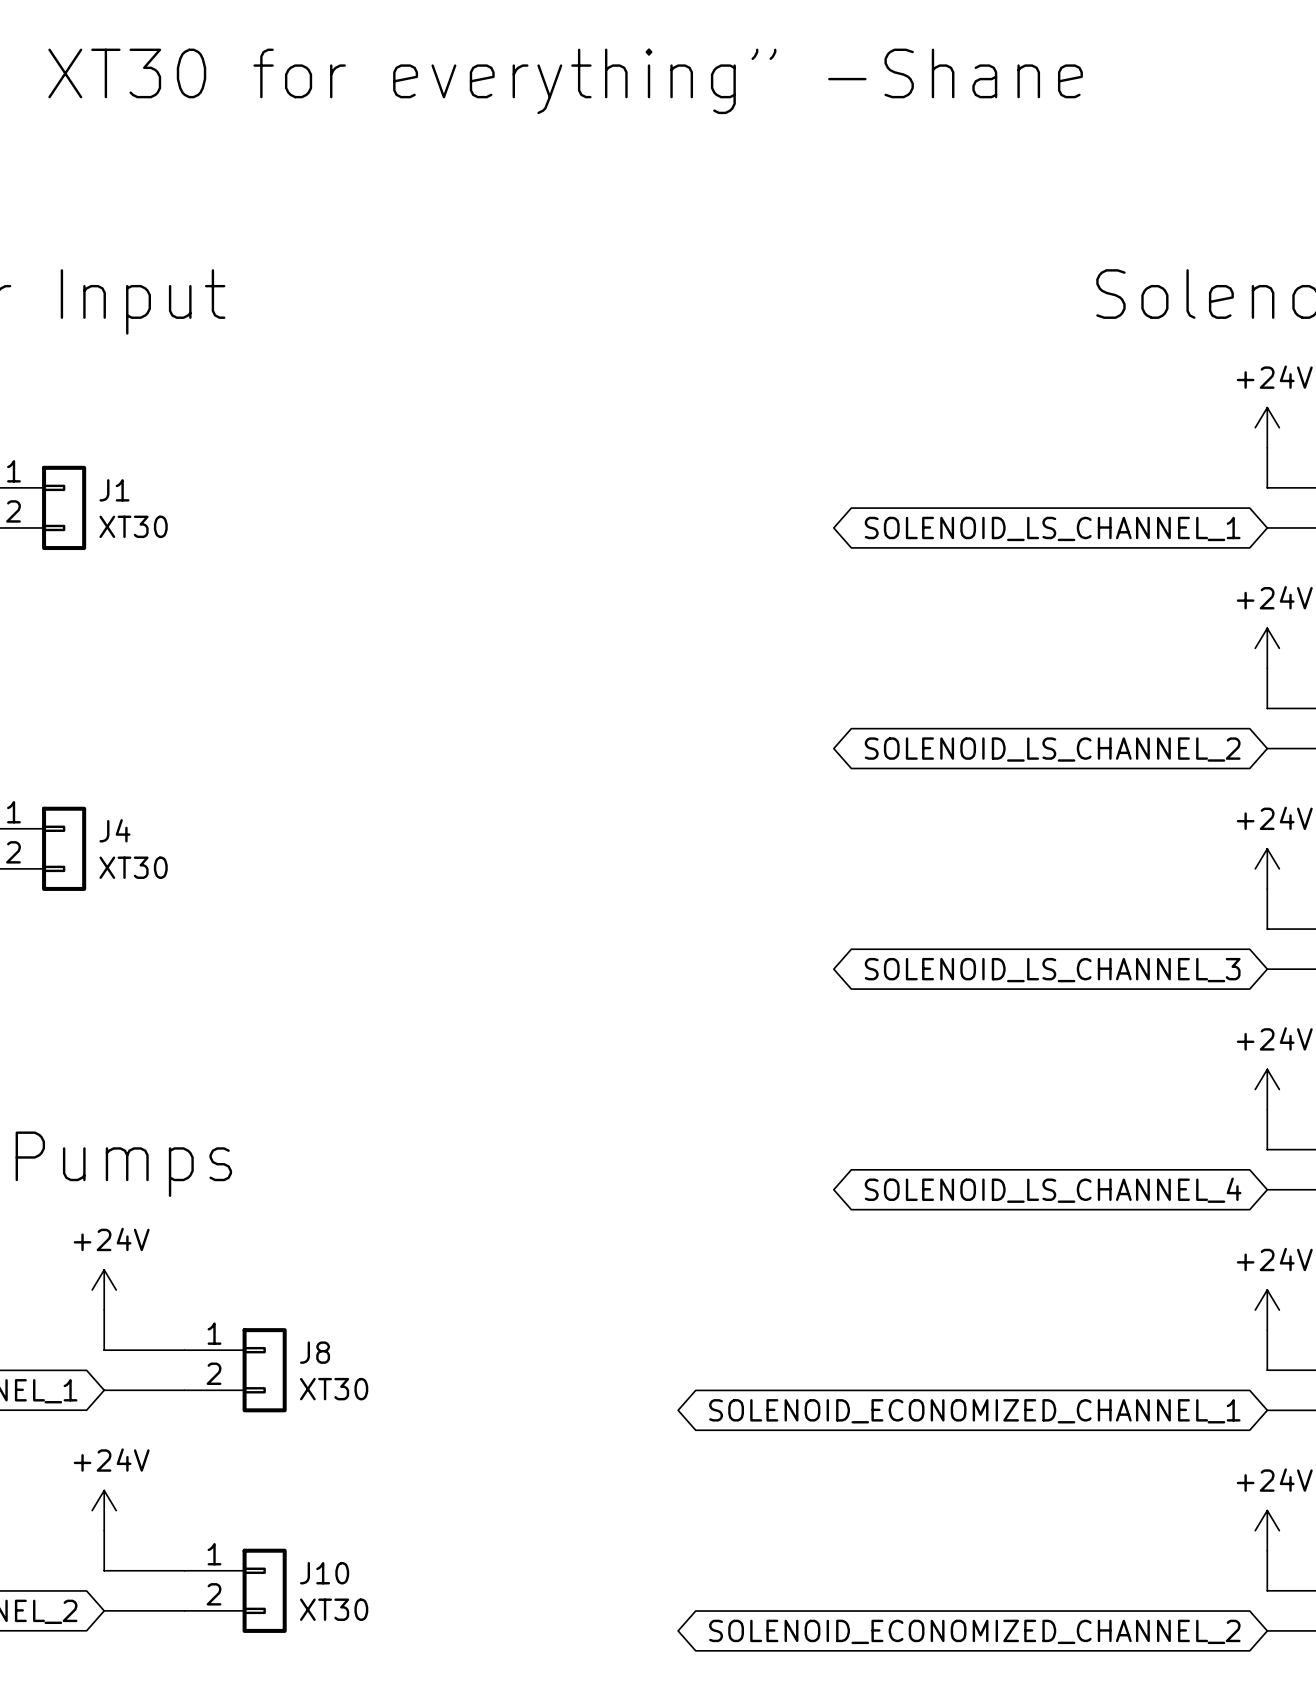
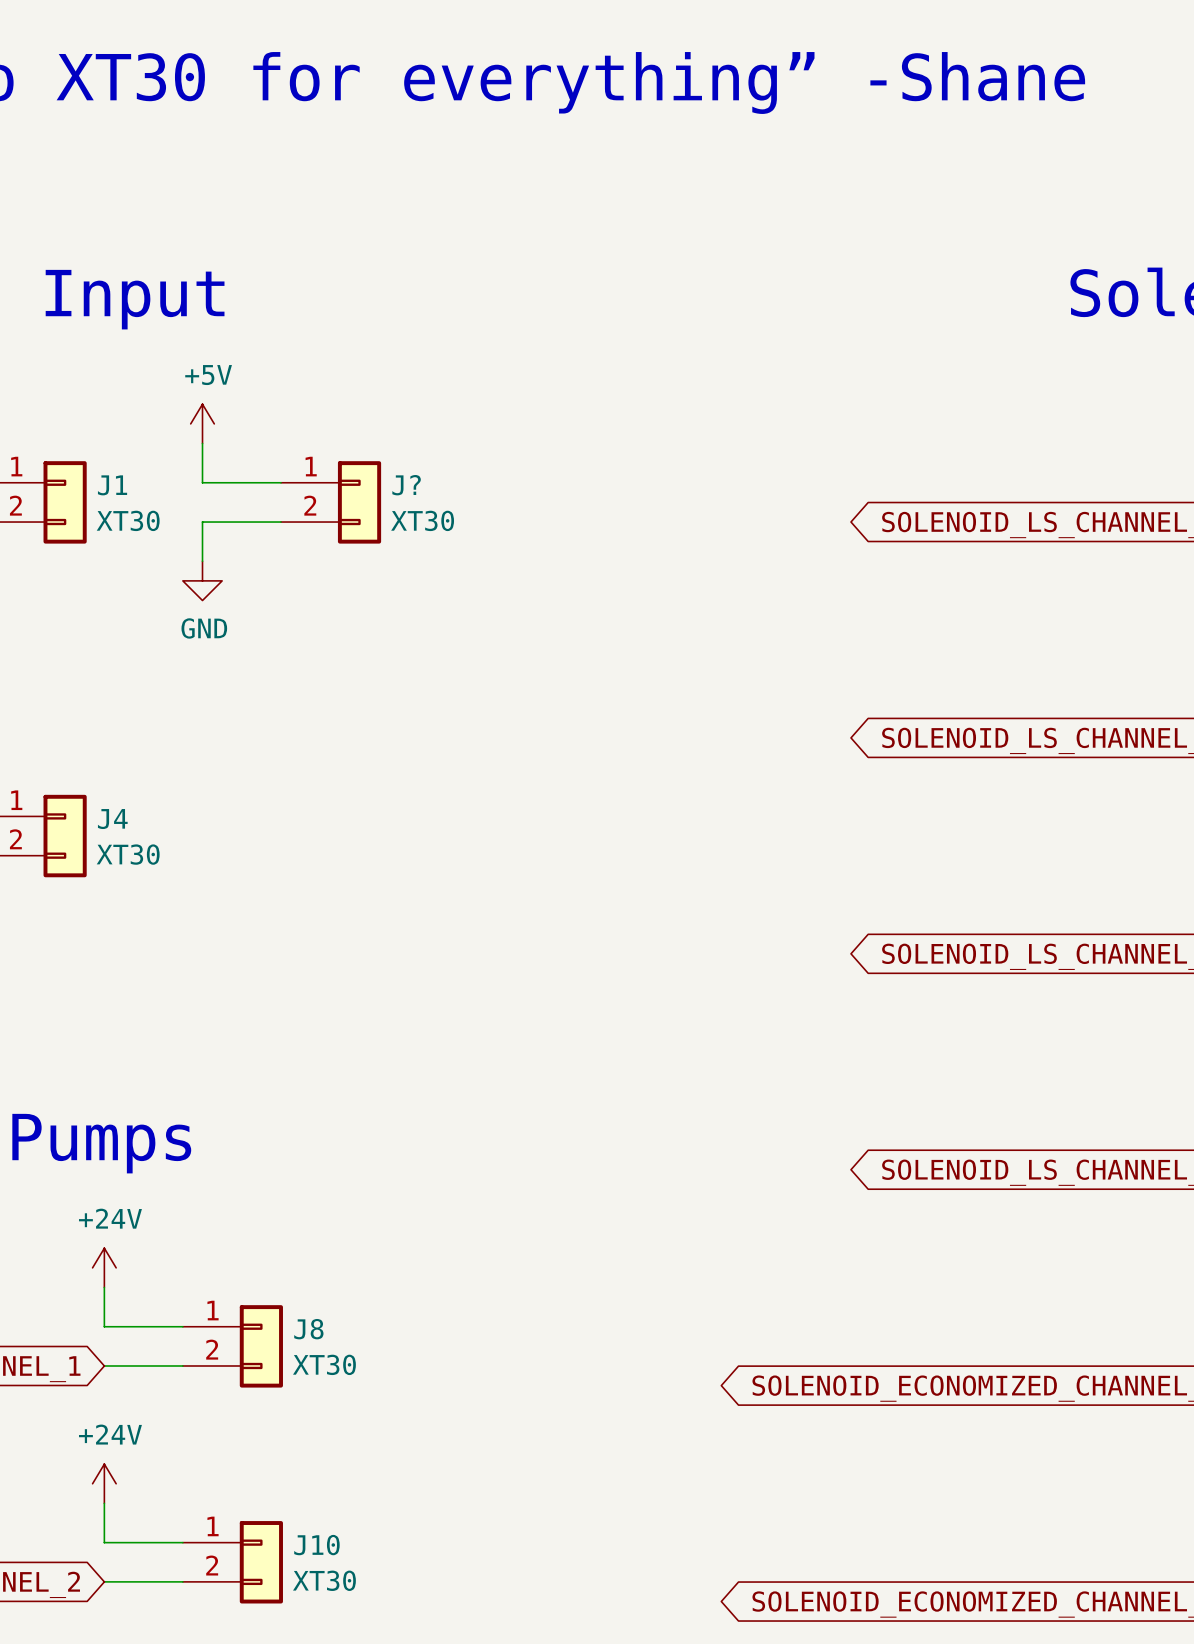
power symbol: none -> +5V (202, 423)
wire: none -> (202, 443) (202, 482) (281, 482)
J?: none -> XT30 (331, 502)
wire: none -> (281, 522) (202, 522) (202, 561)
power symbol: none -> GND (202, 580)

